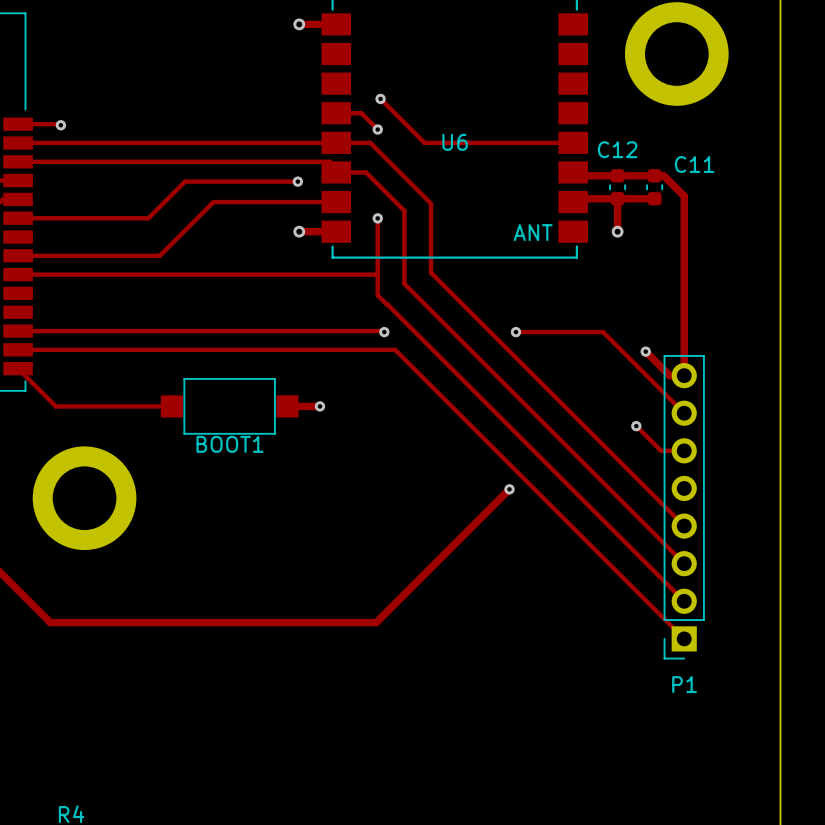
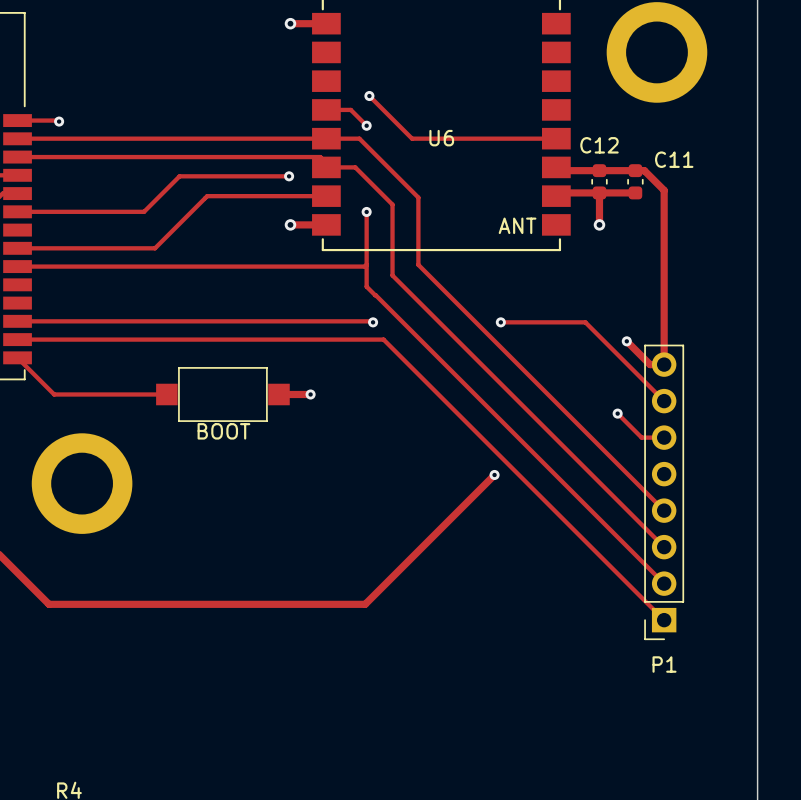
BOOT1 name: BOOT1 (230, 444) -> BOOT (223, 431)

